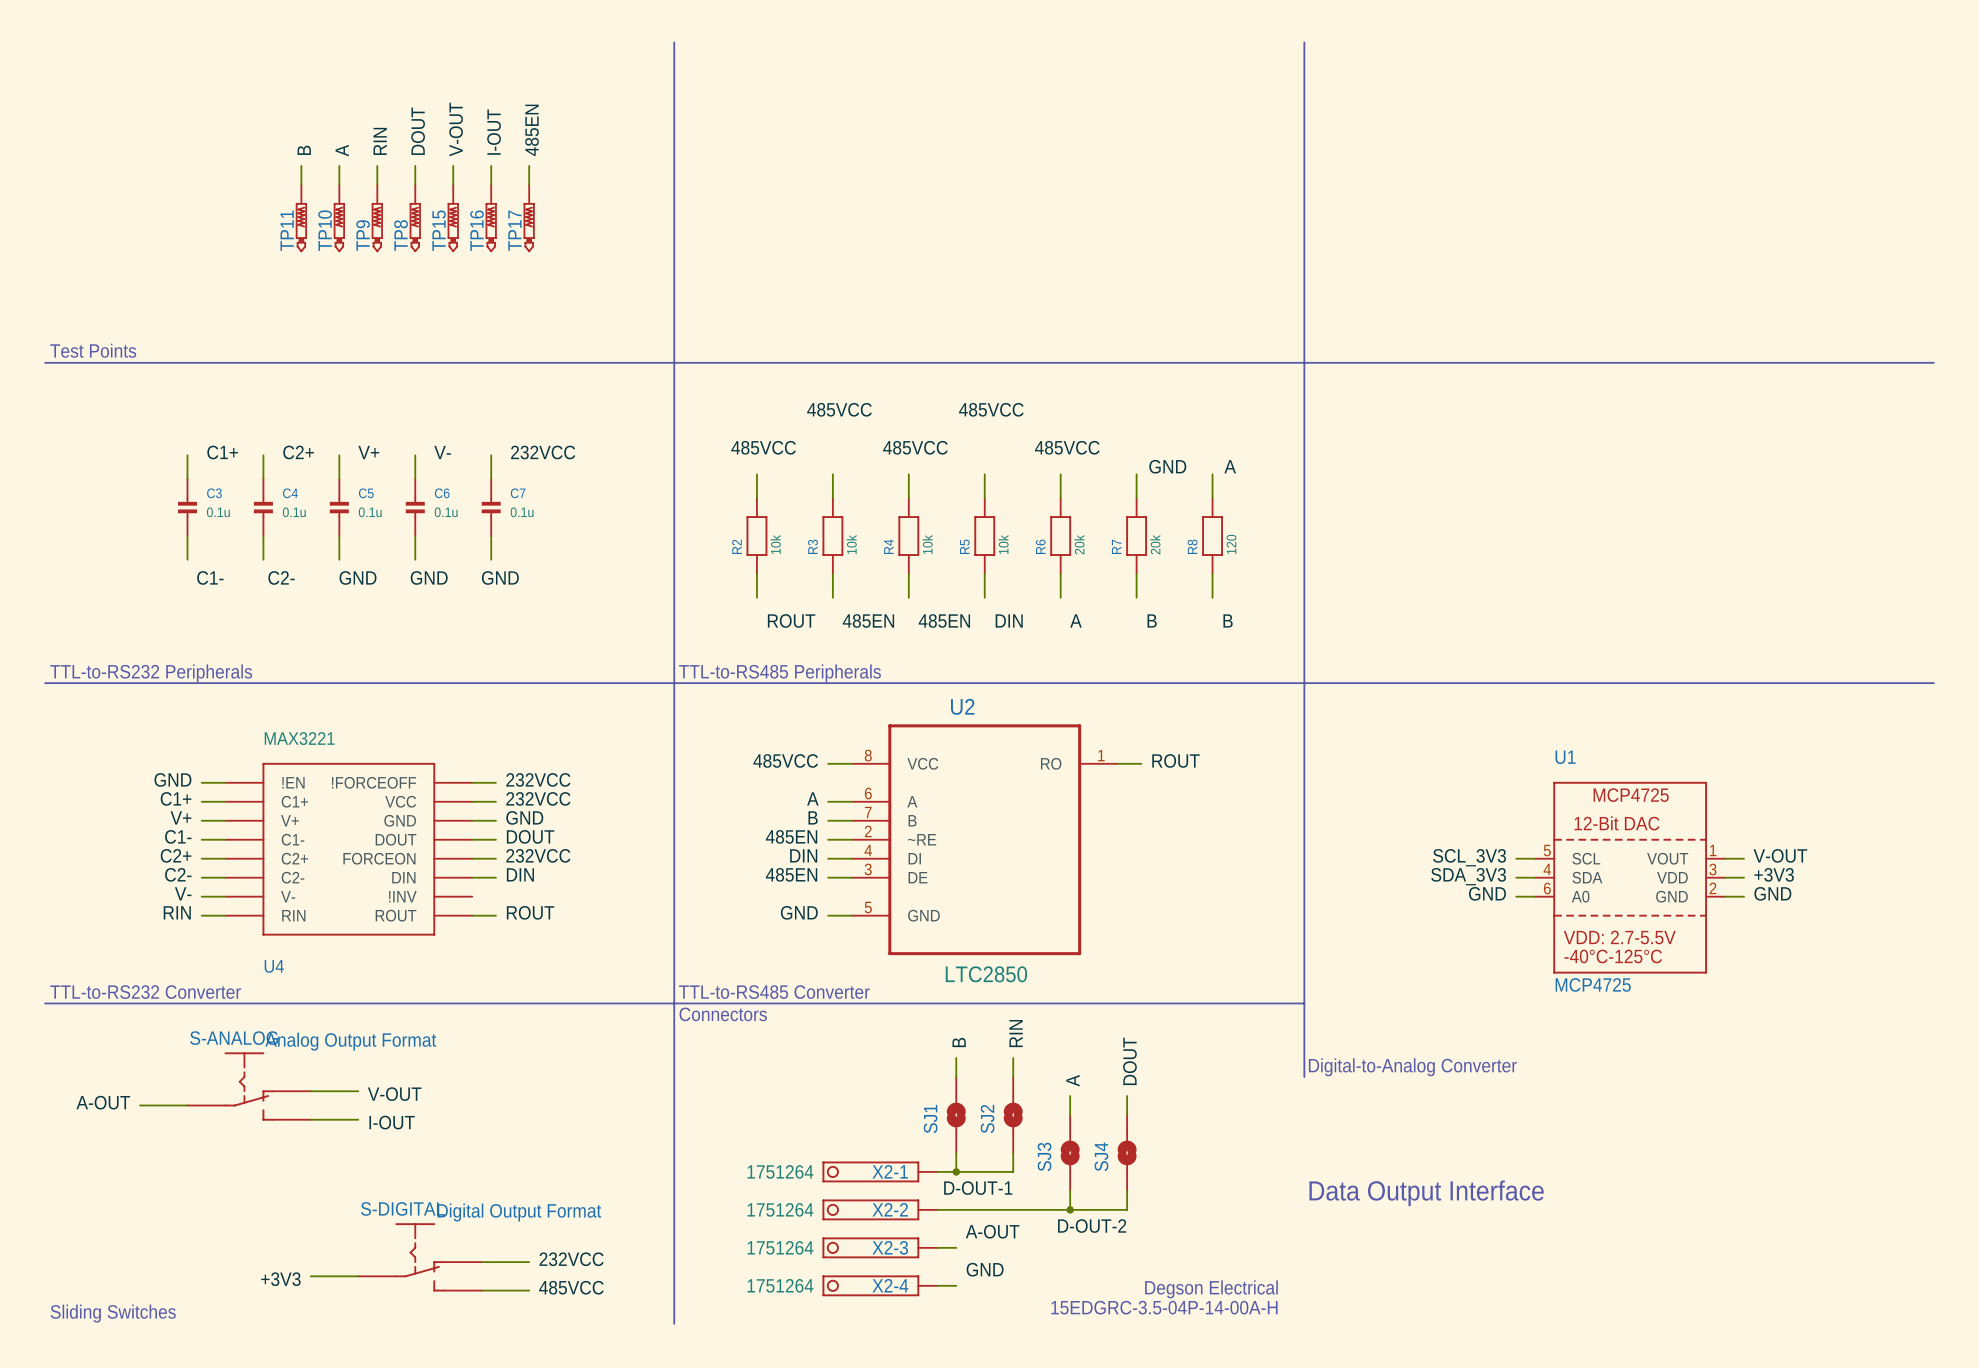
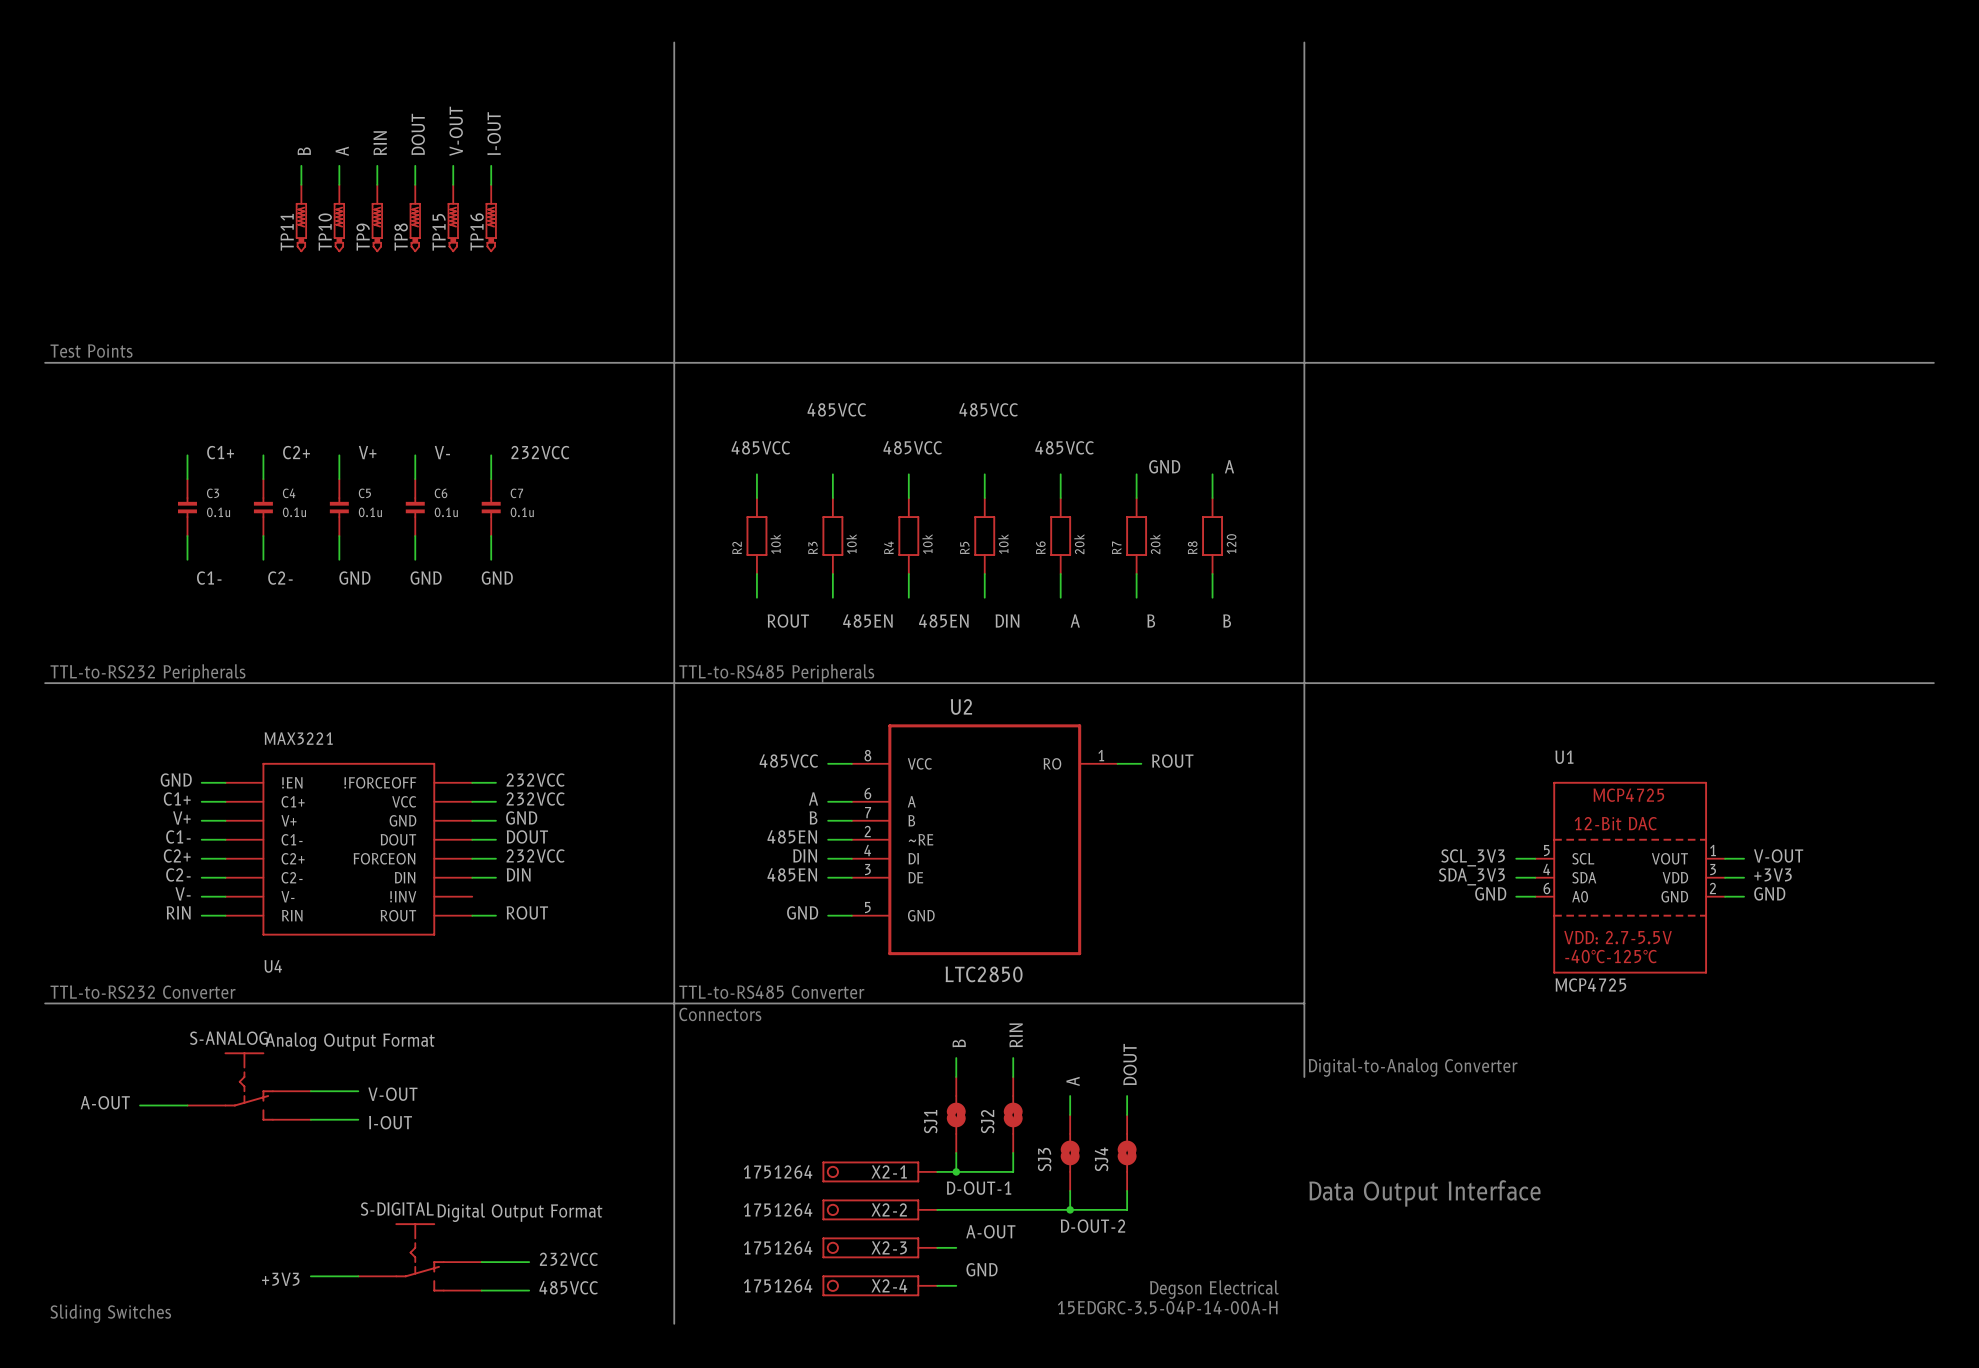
label: 485EN (532, 130) -> none
wire: (529, 165) (529, 184) -> none
TP17: (529, 218) -> none

